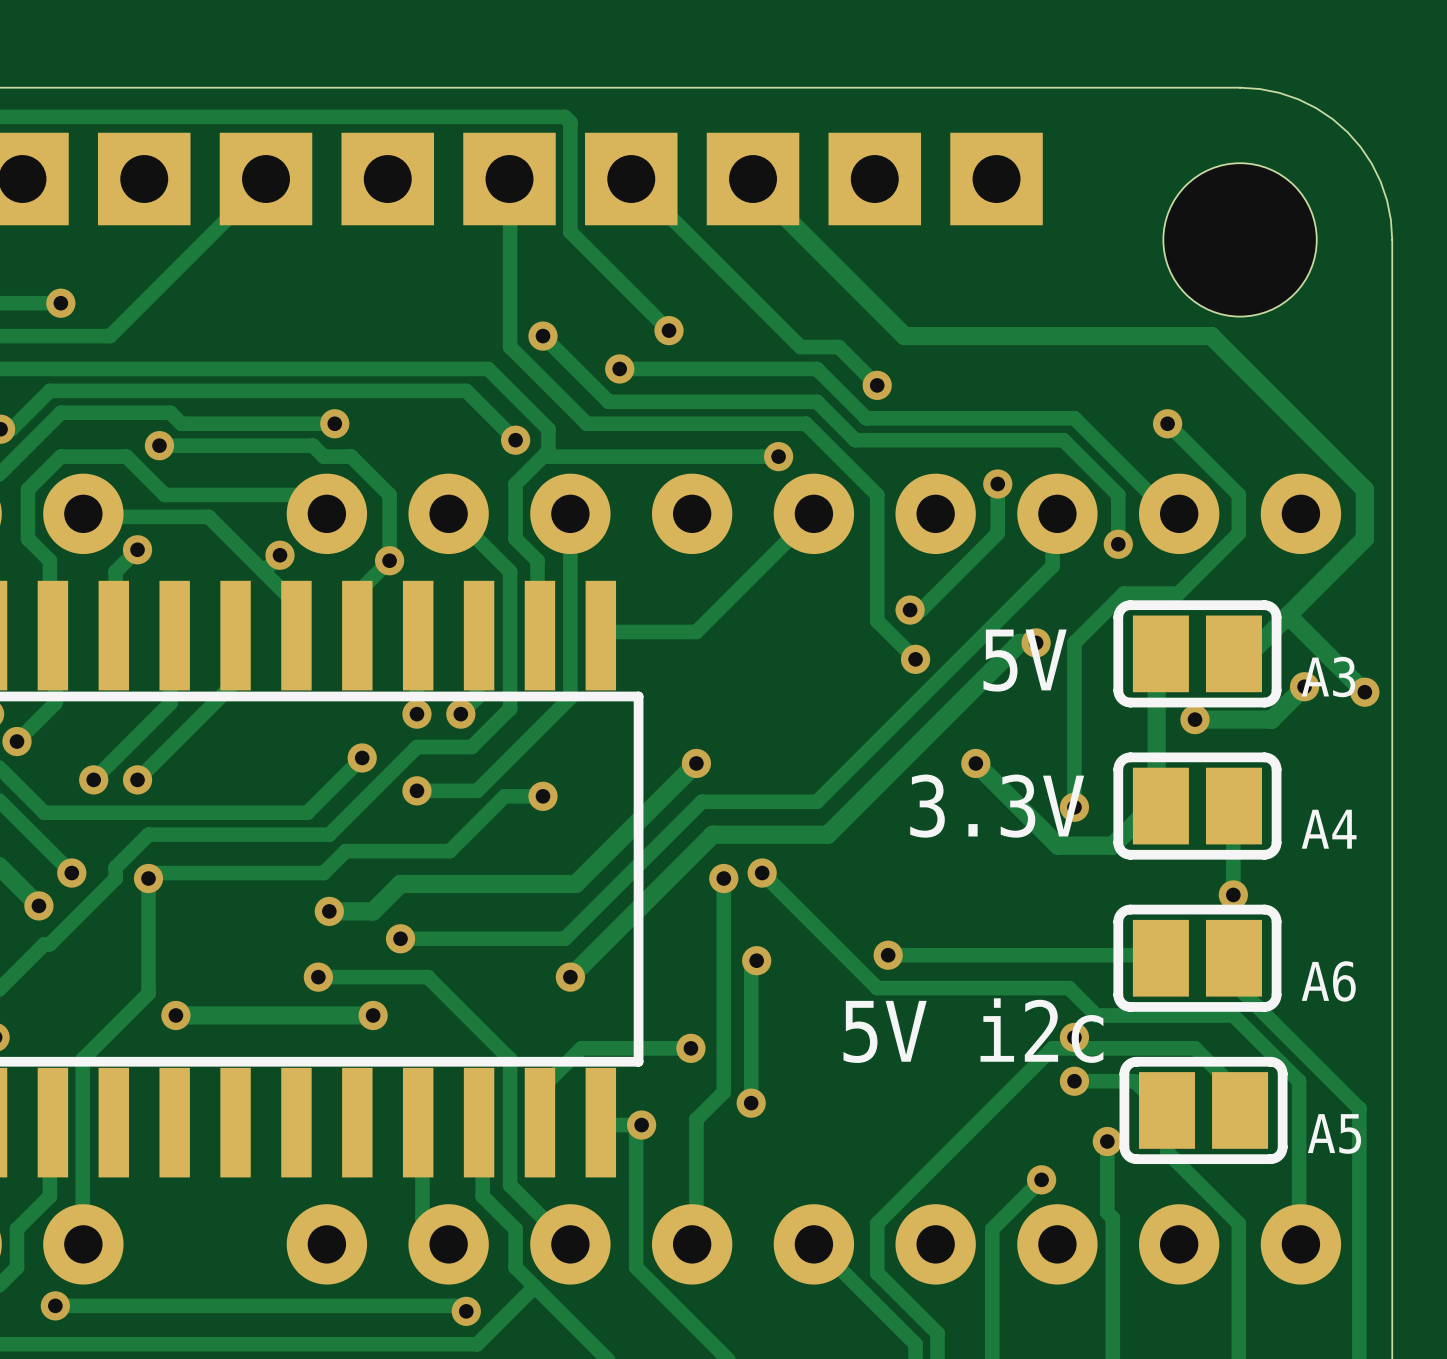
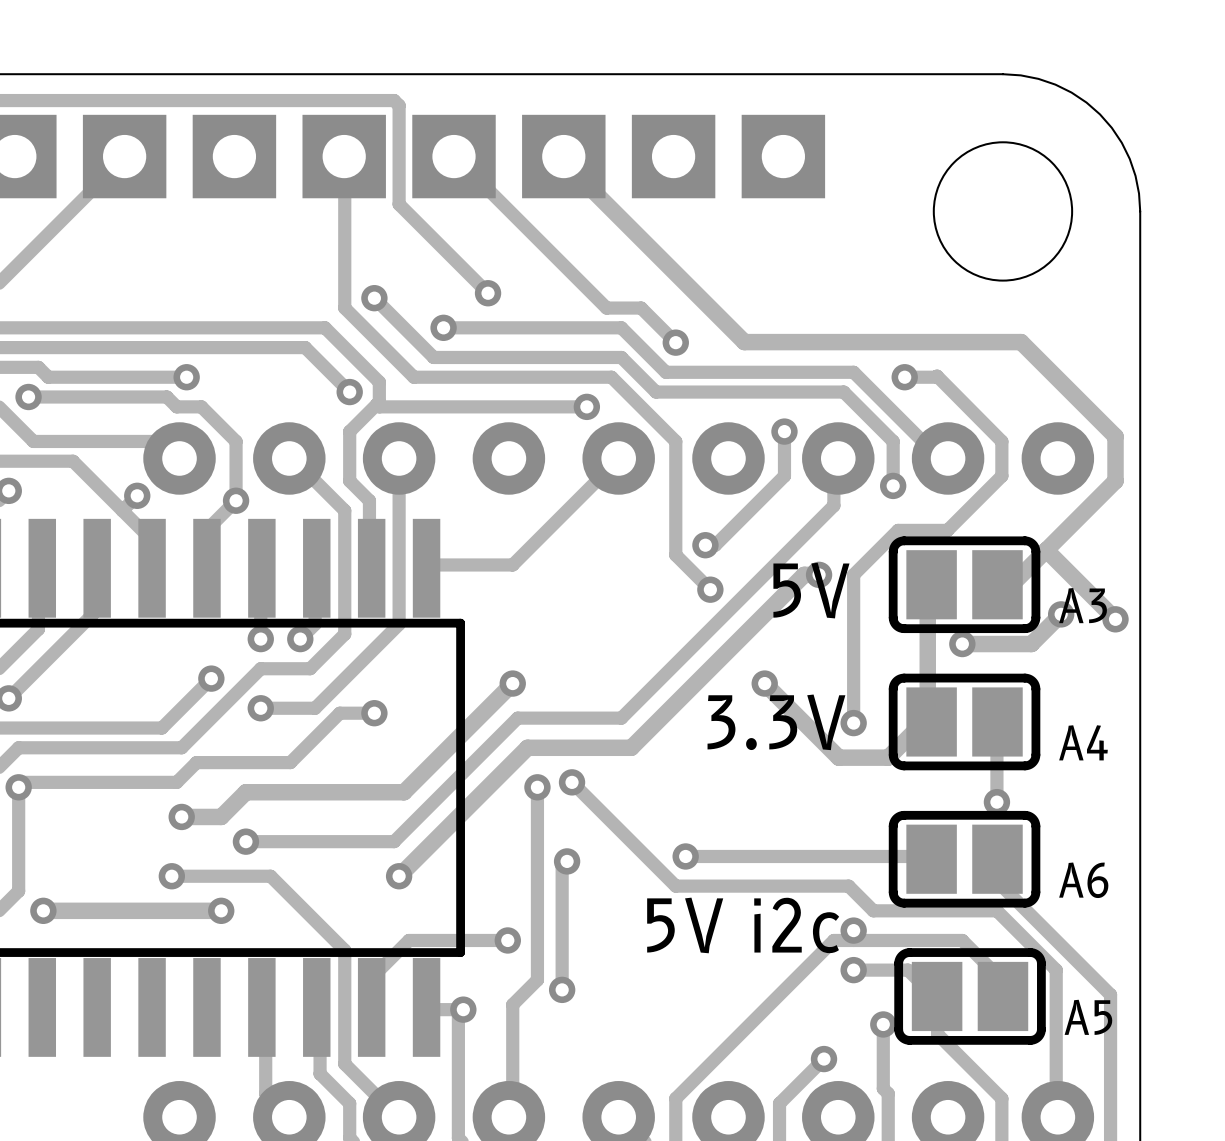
track: (904, 336) (1211, 336) (1260, 384) -> (700, 298) (744, 342) (1021, 342)
track: (1167, 423) (1238, 494) -> (904, 377) (937, 376) (1001, 441)
via position: (1167, 423) -> (904, 377)

